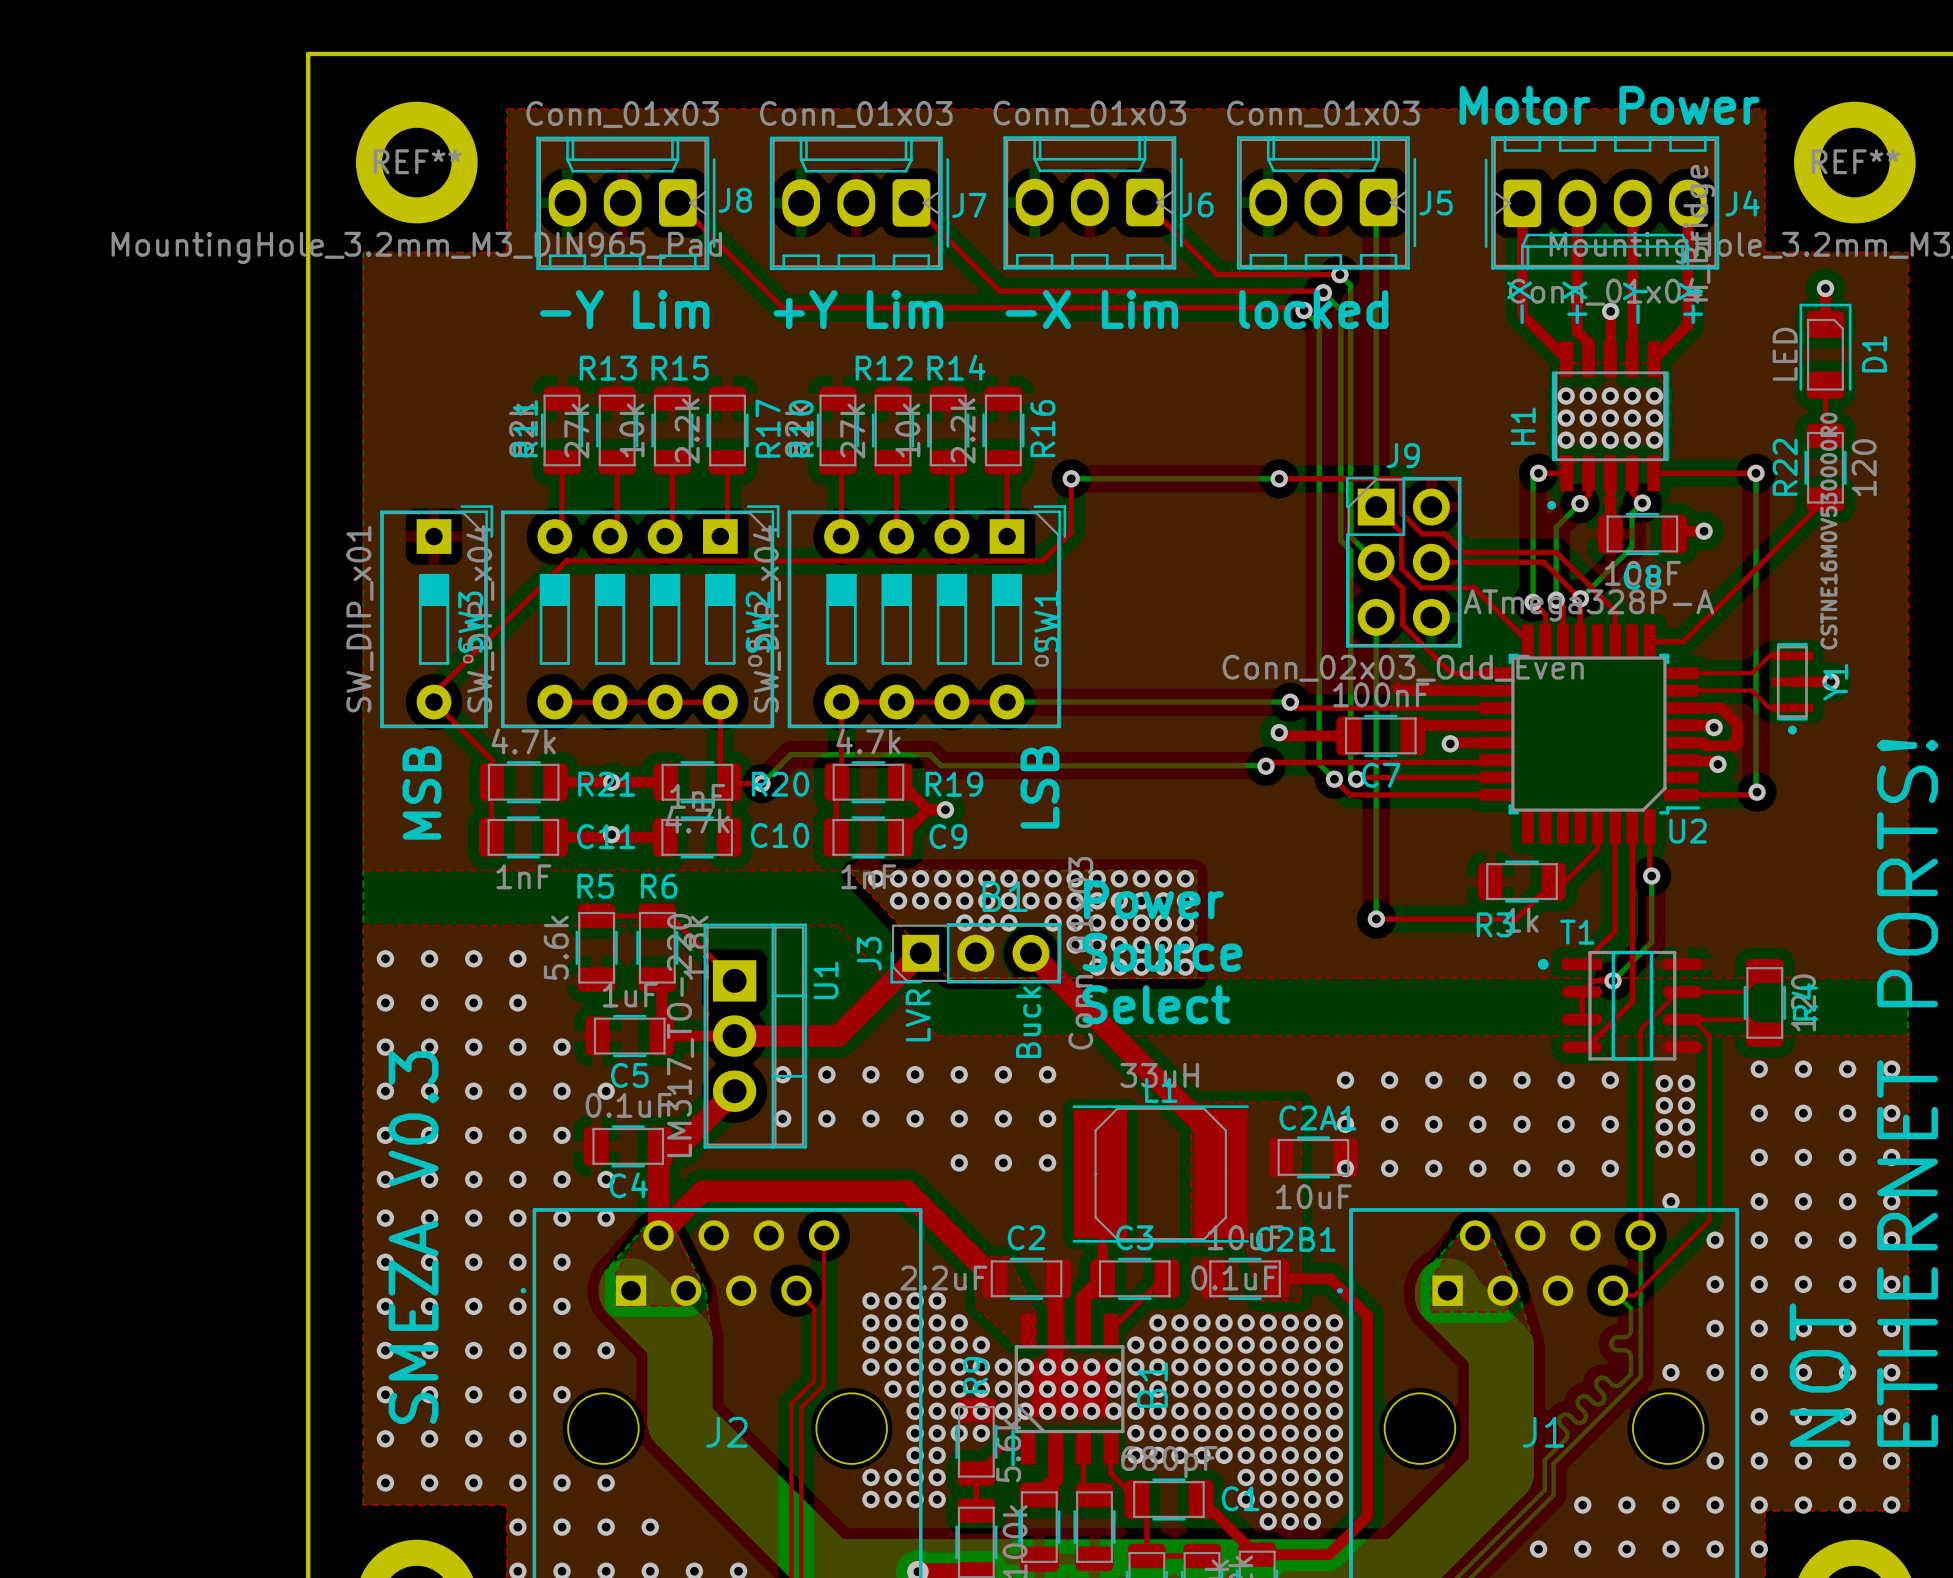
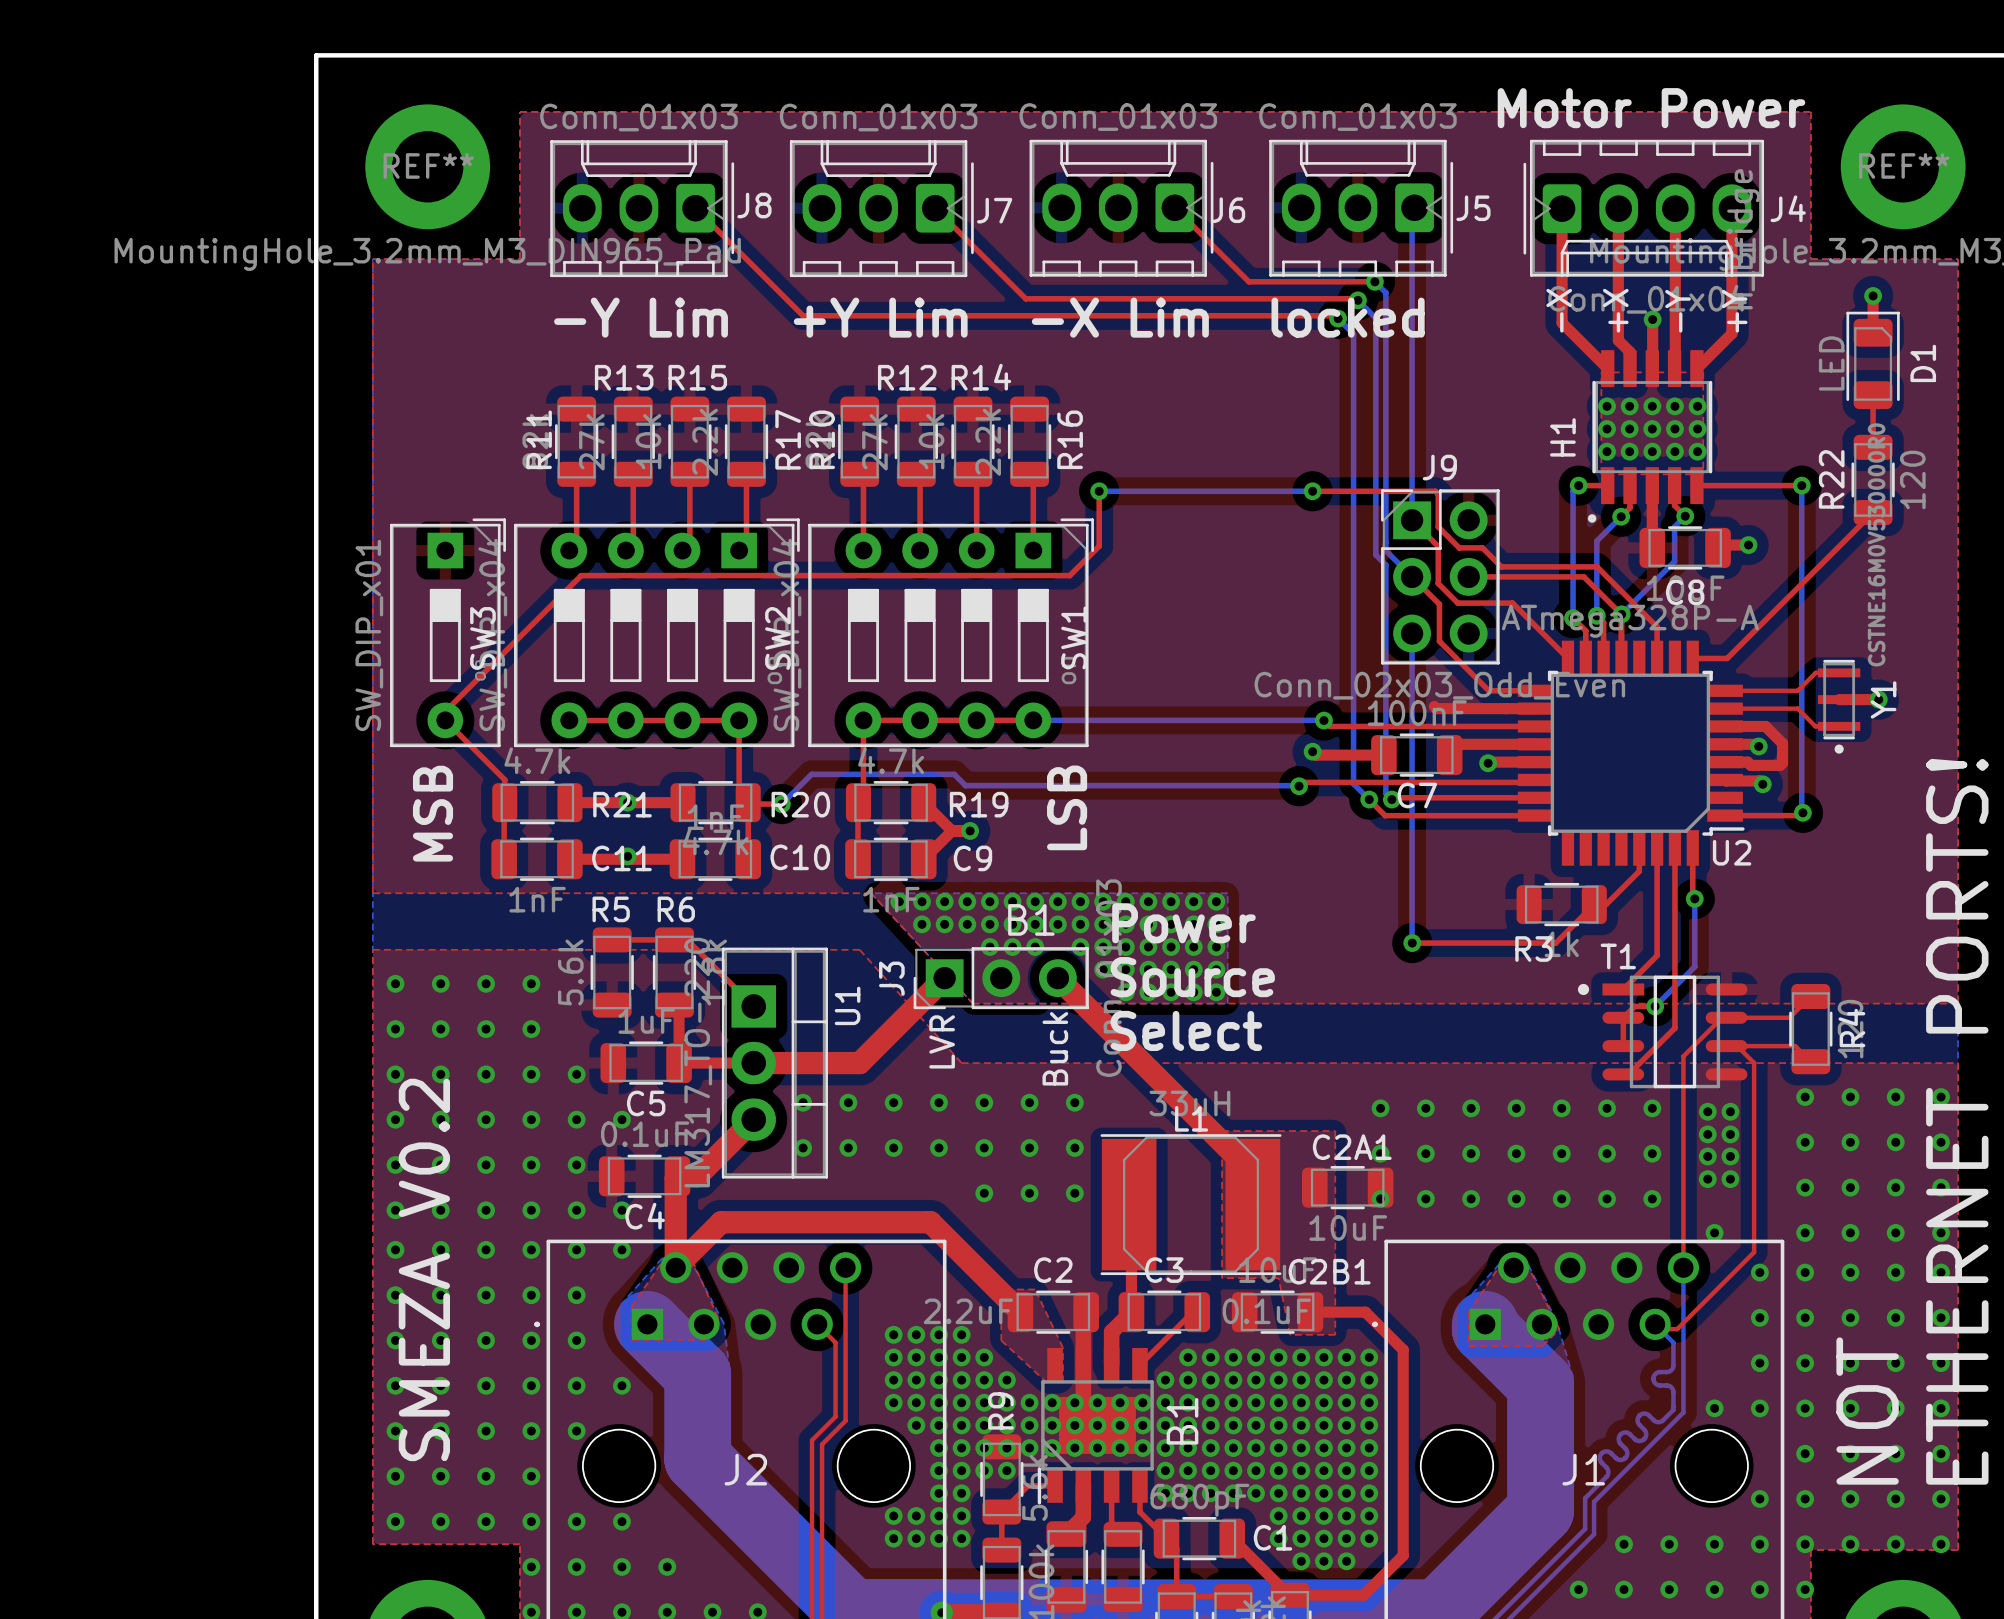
text: SMEZA V0.3 (413, 1237) -> SMEZA V0.2 (424, 1269)

